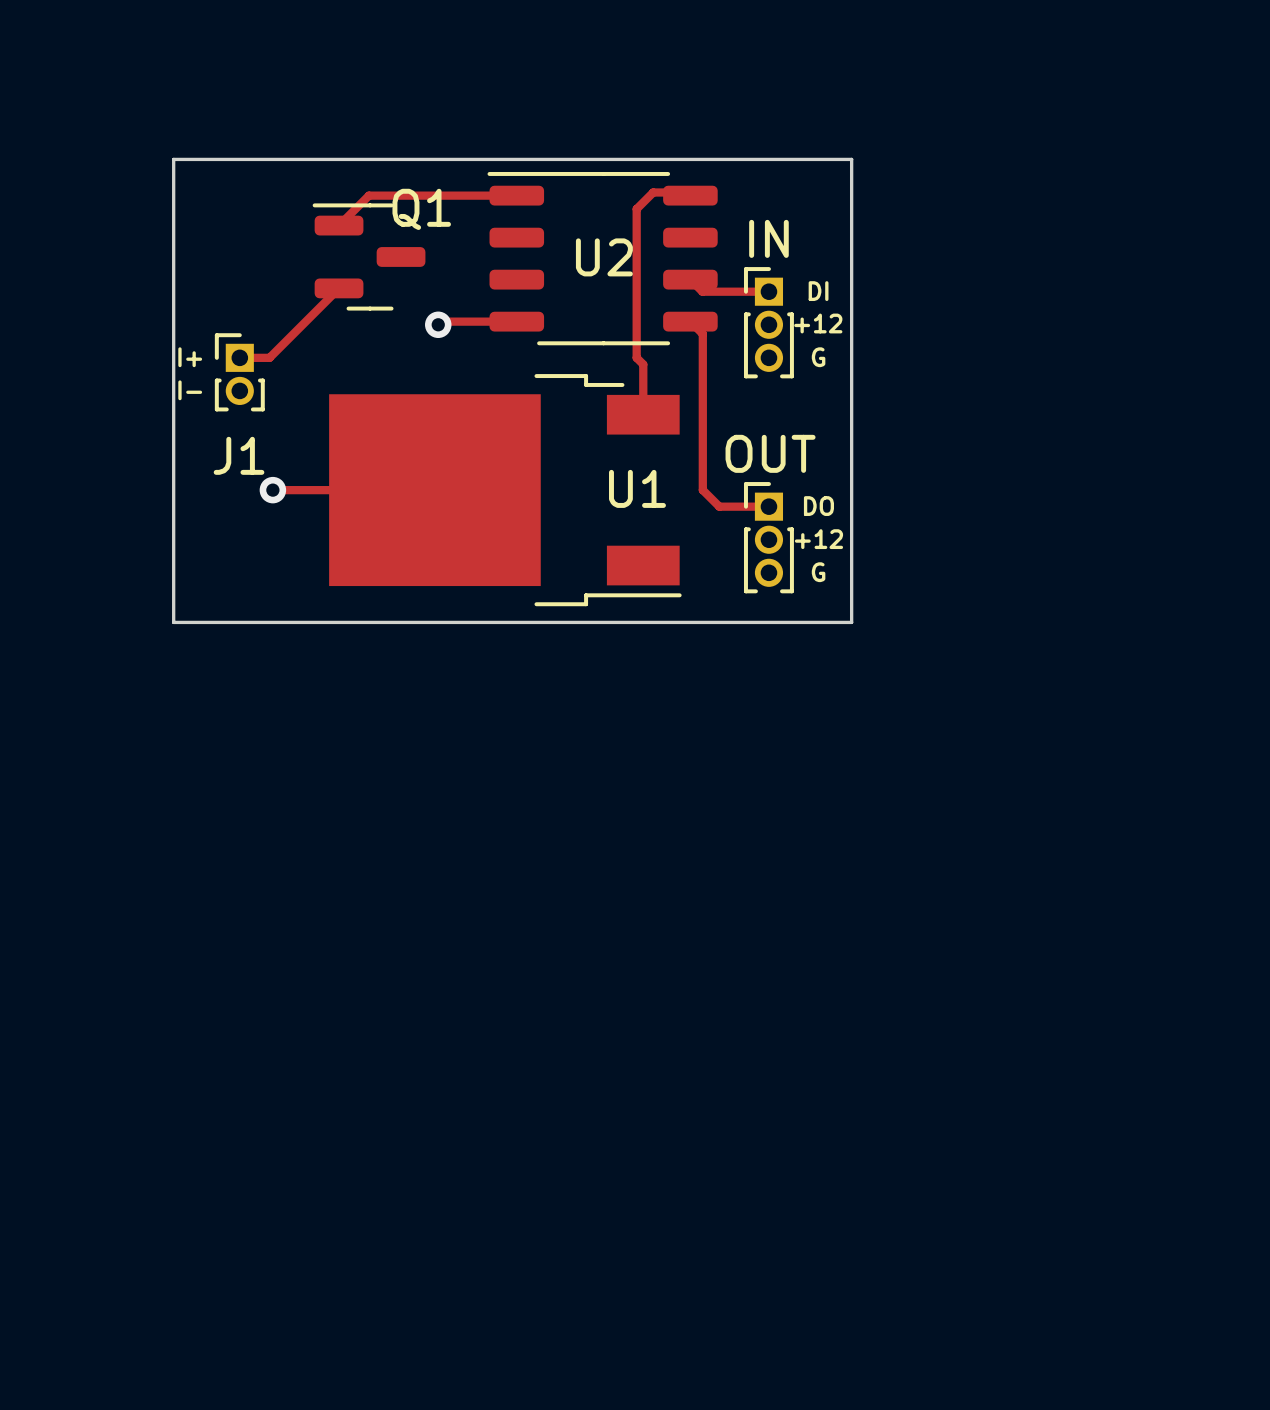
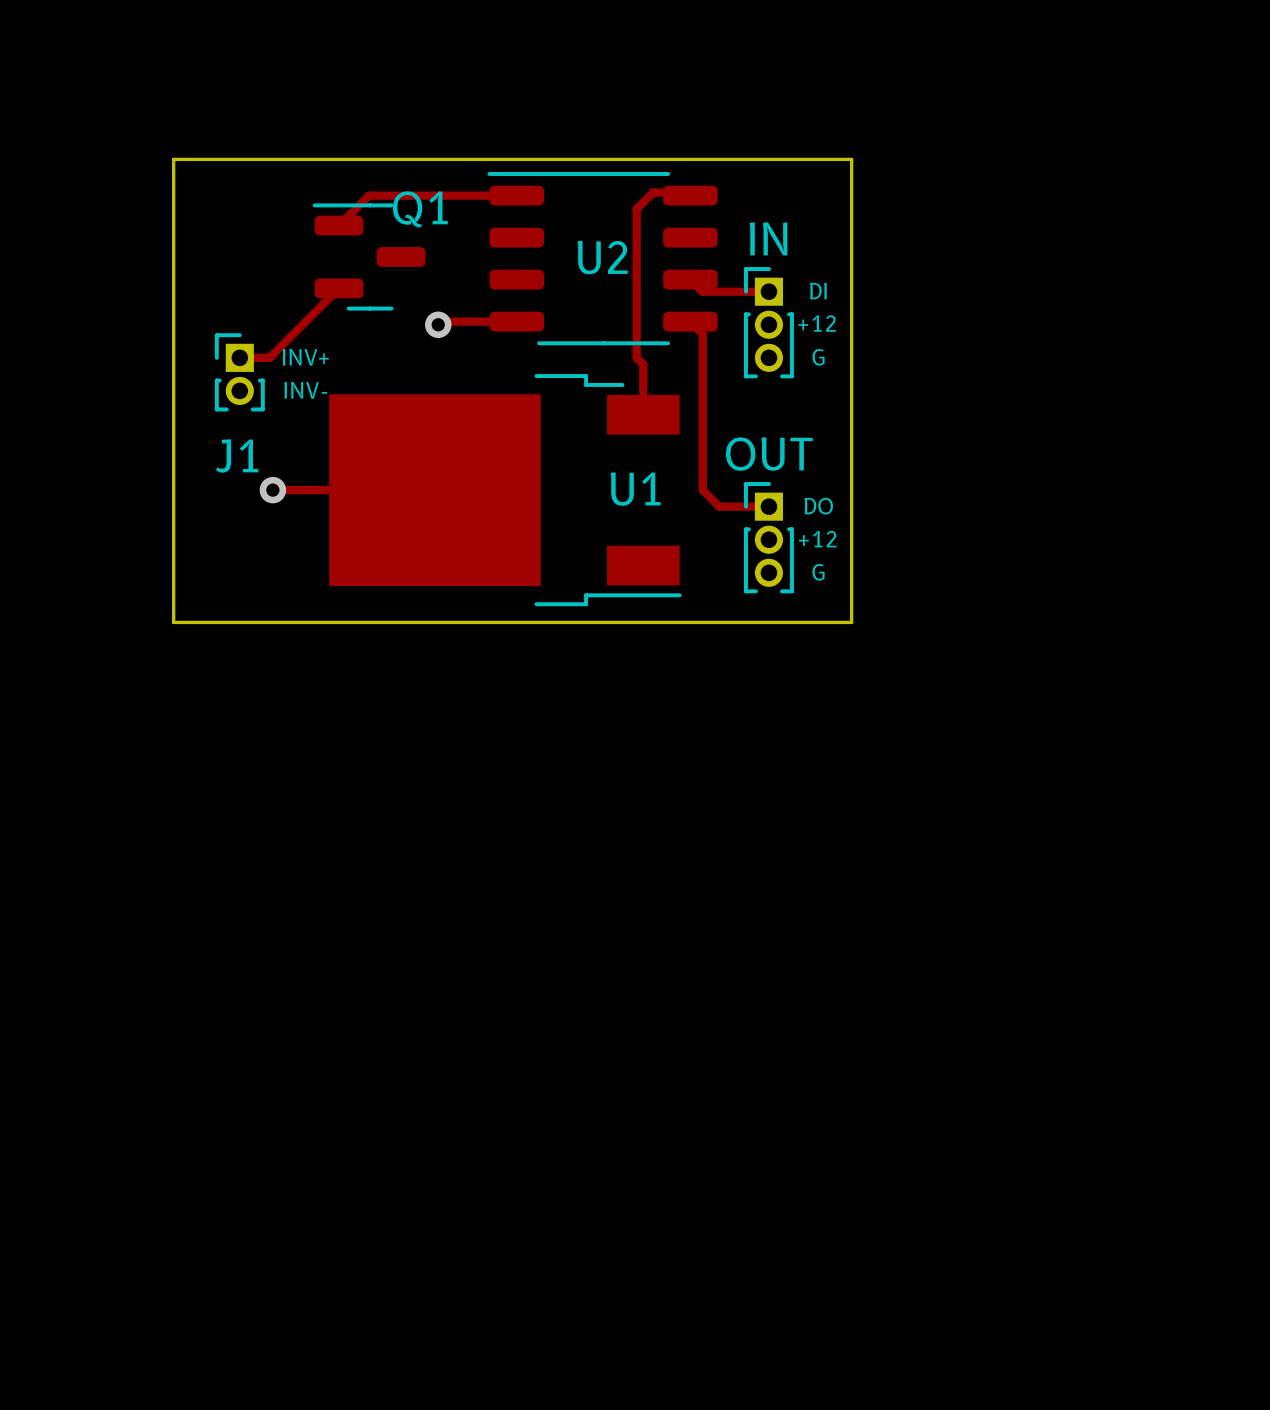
text: I+ (190, 357) -> none
text: none -> INV+ (305, 357)
text: I- (190, 390) -> none
text: none -> INV- (305, 390)

